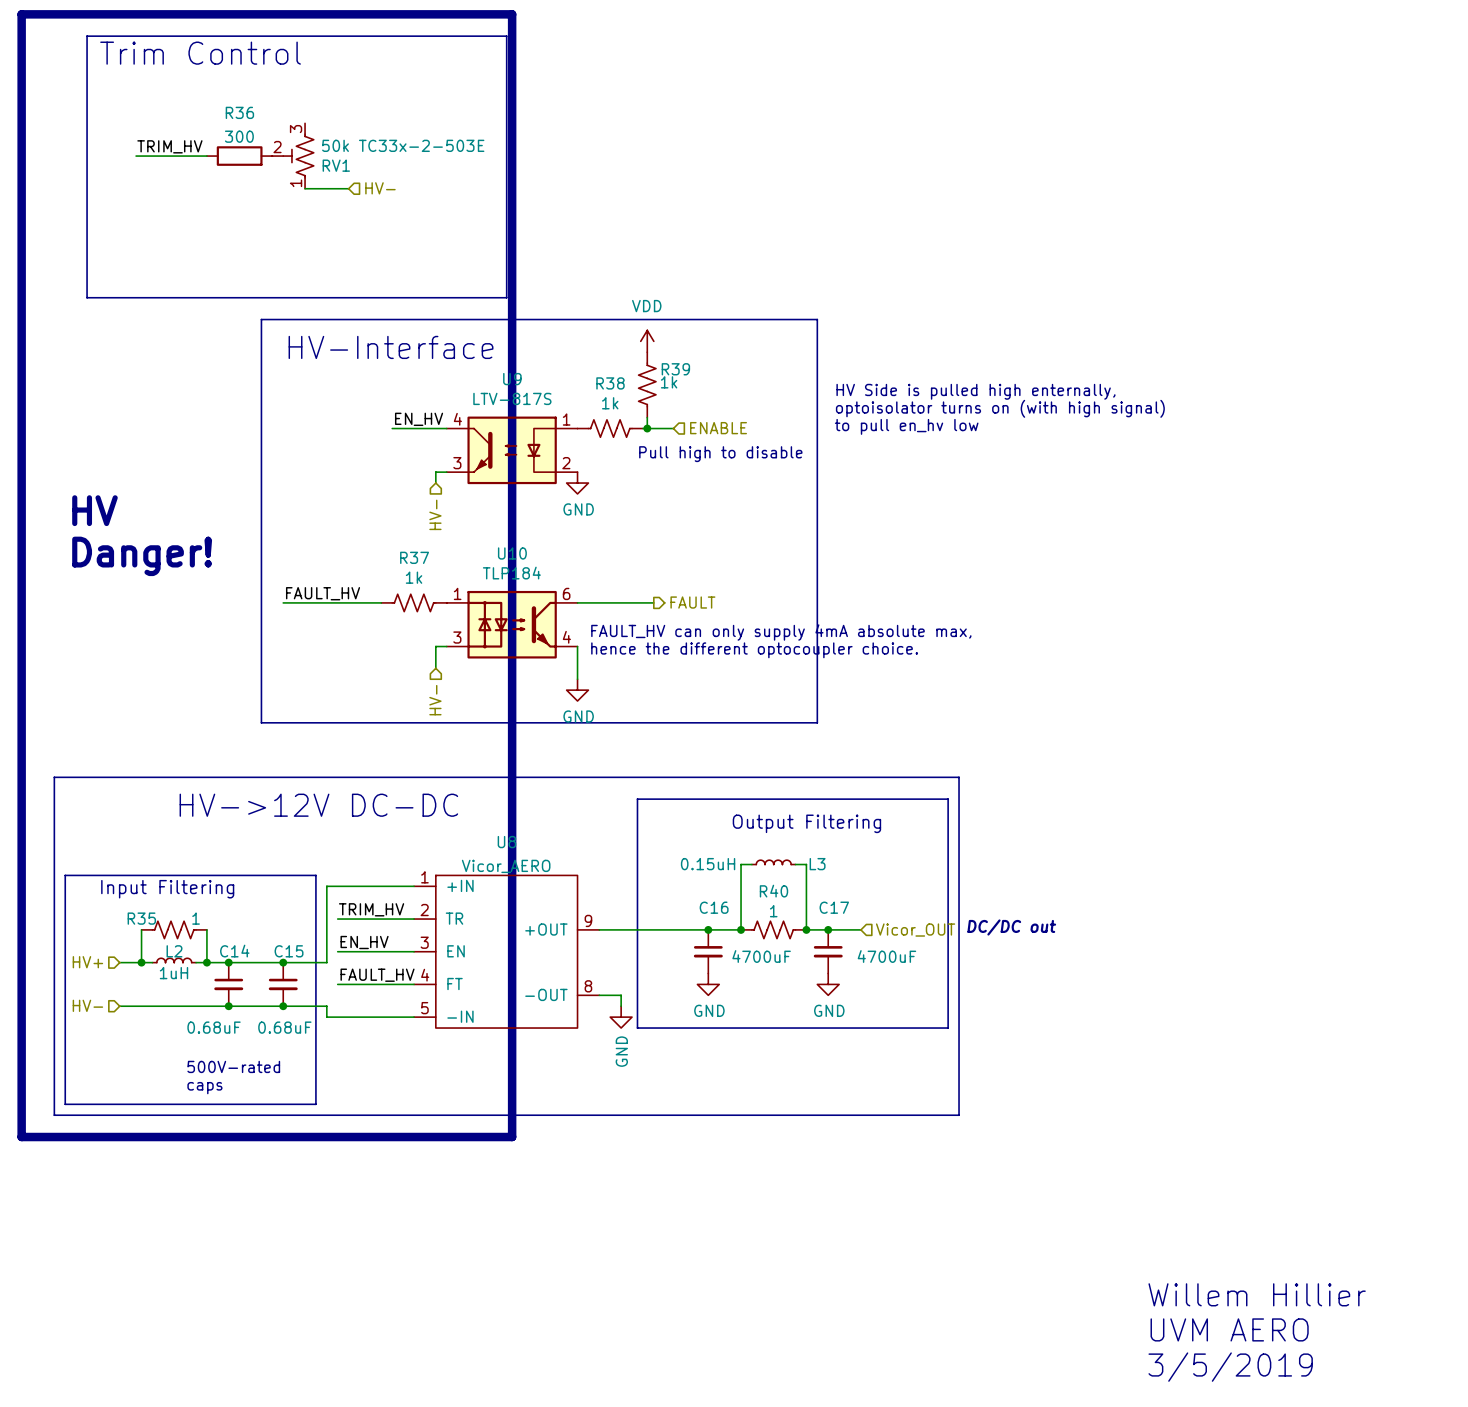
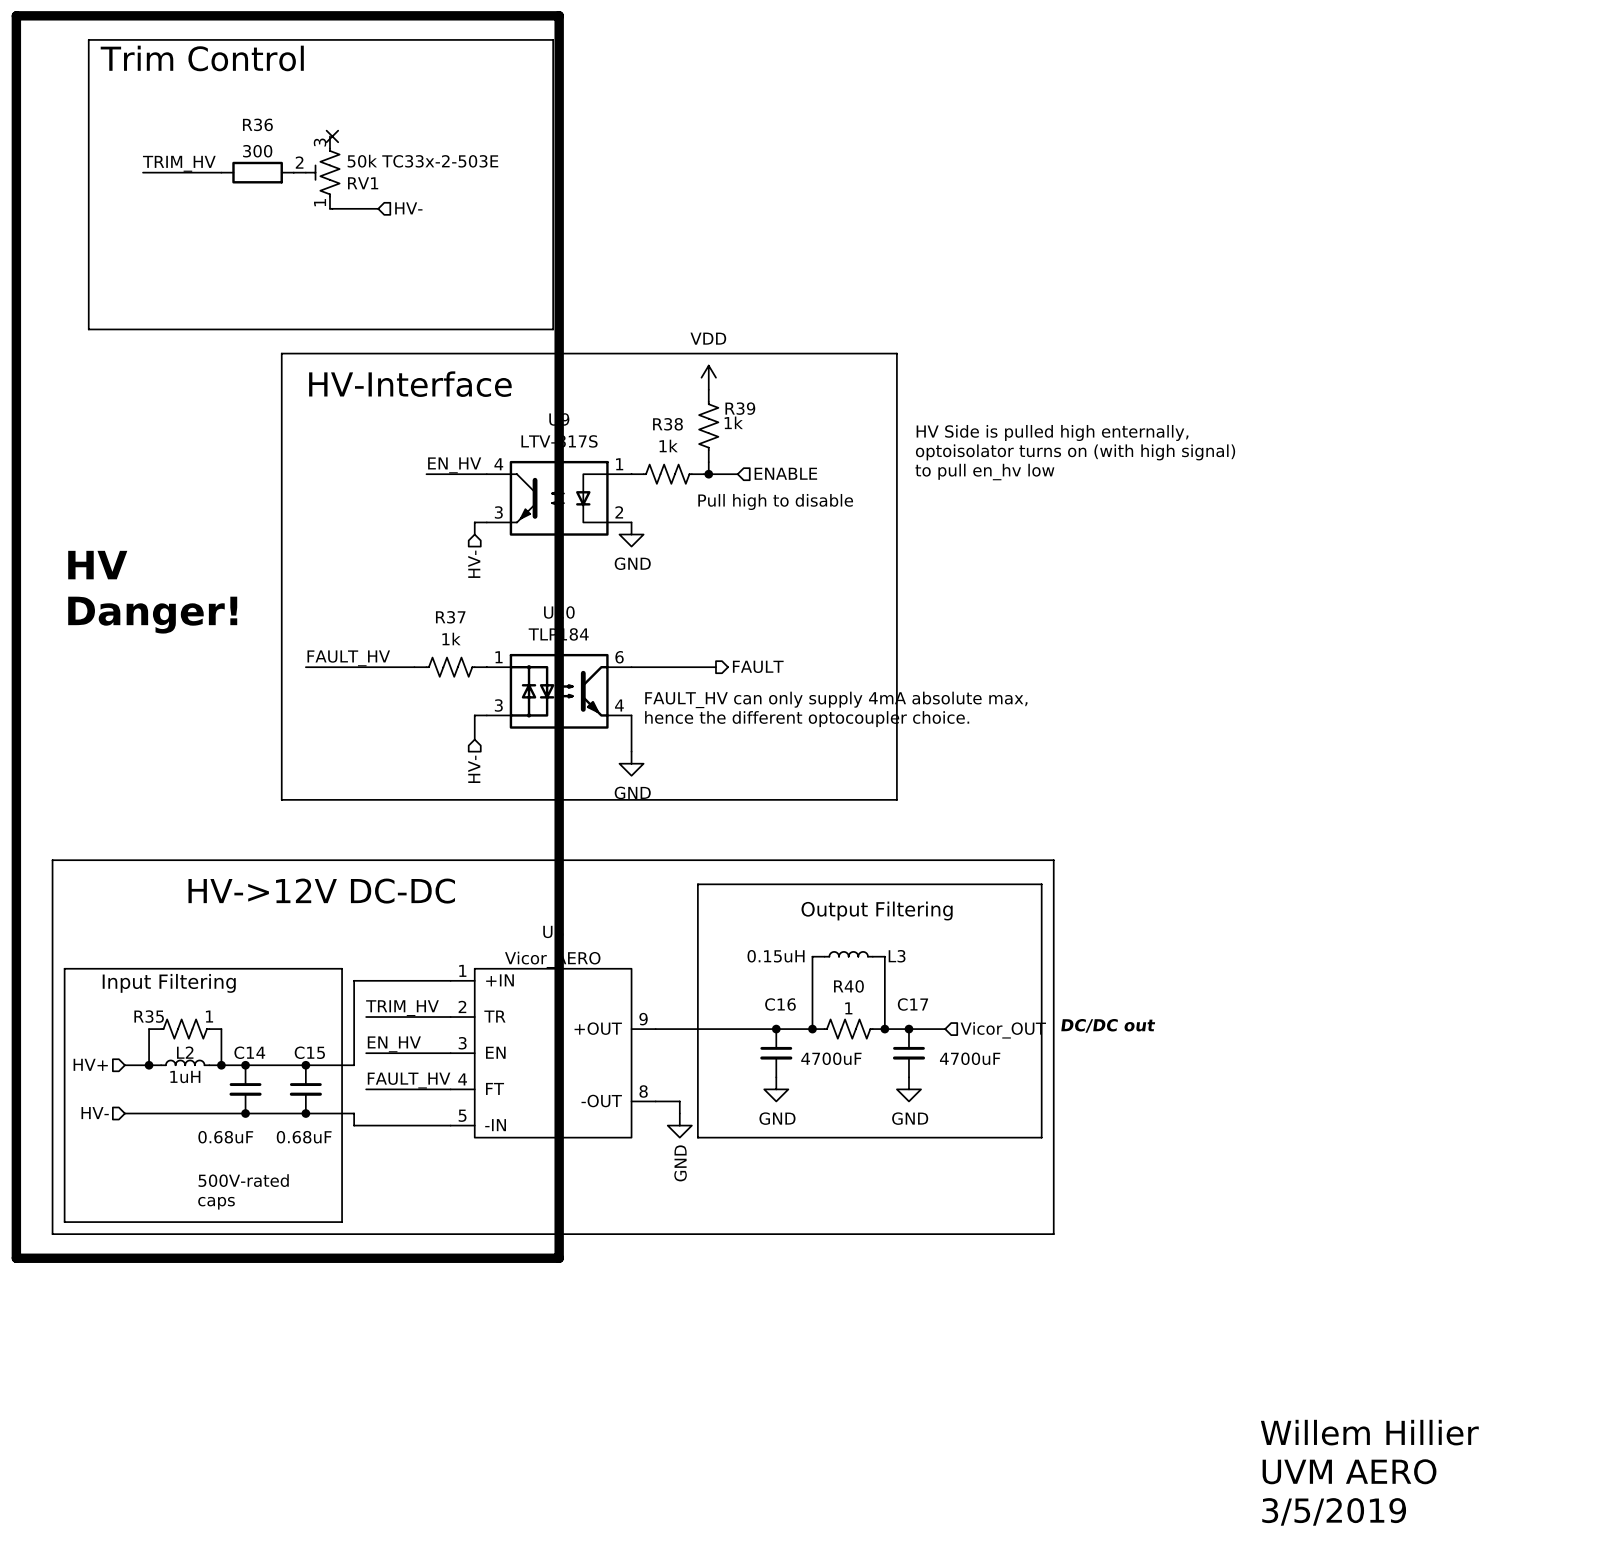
no-connect mark: none -> (332, 136)

